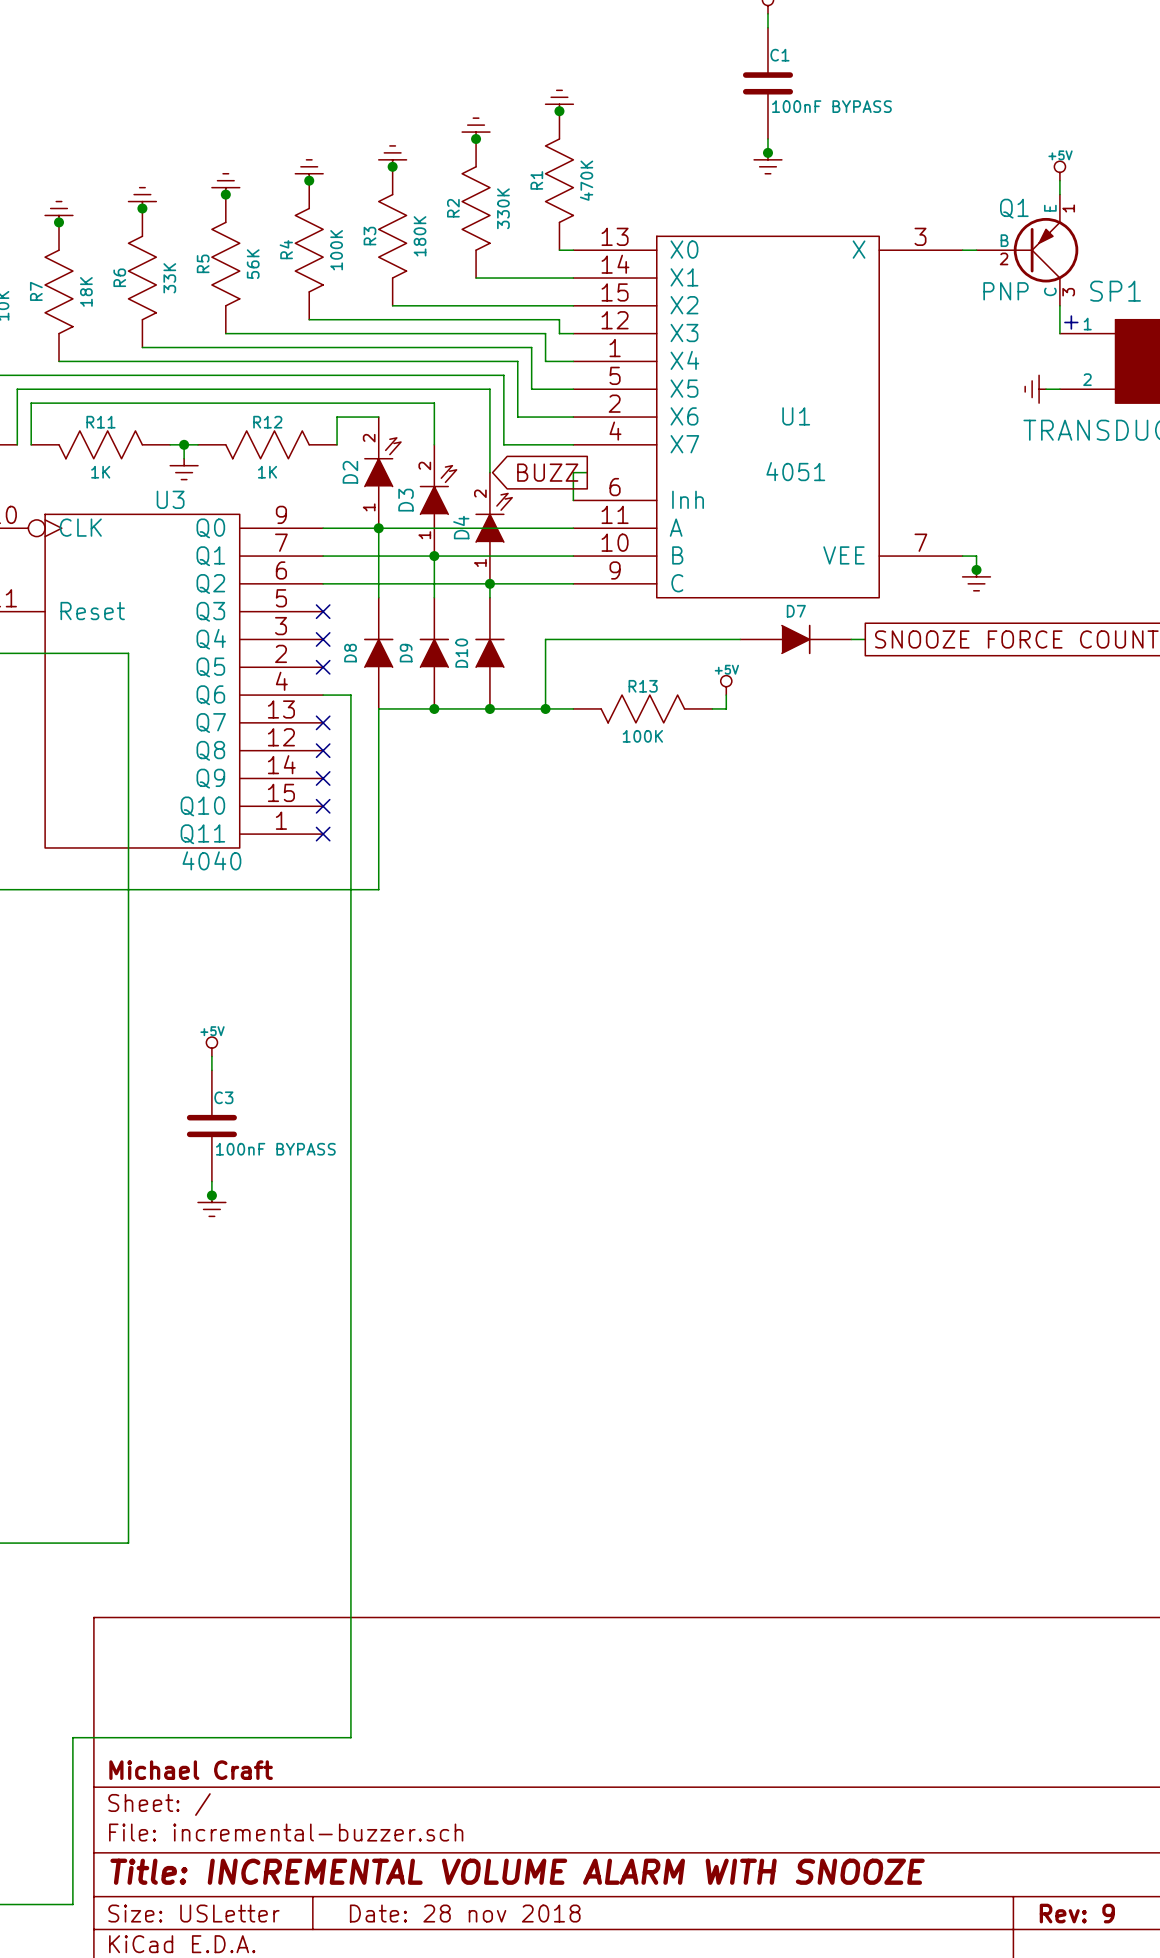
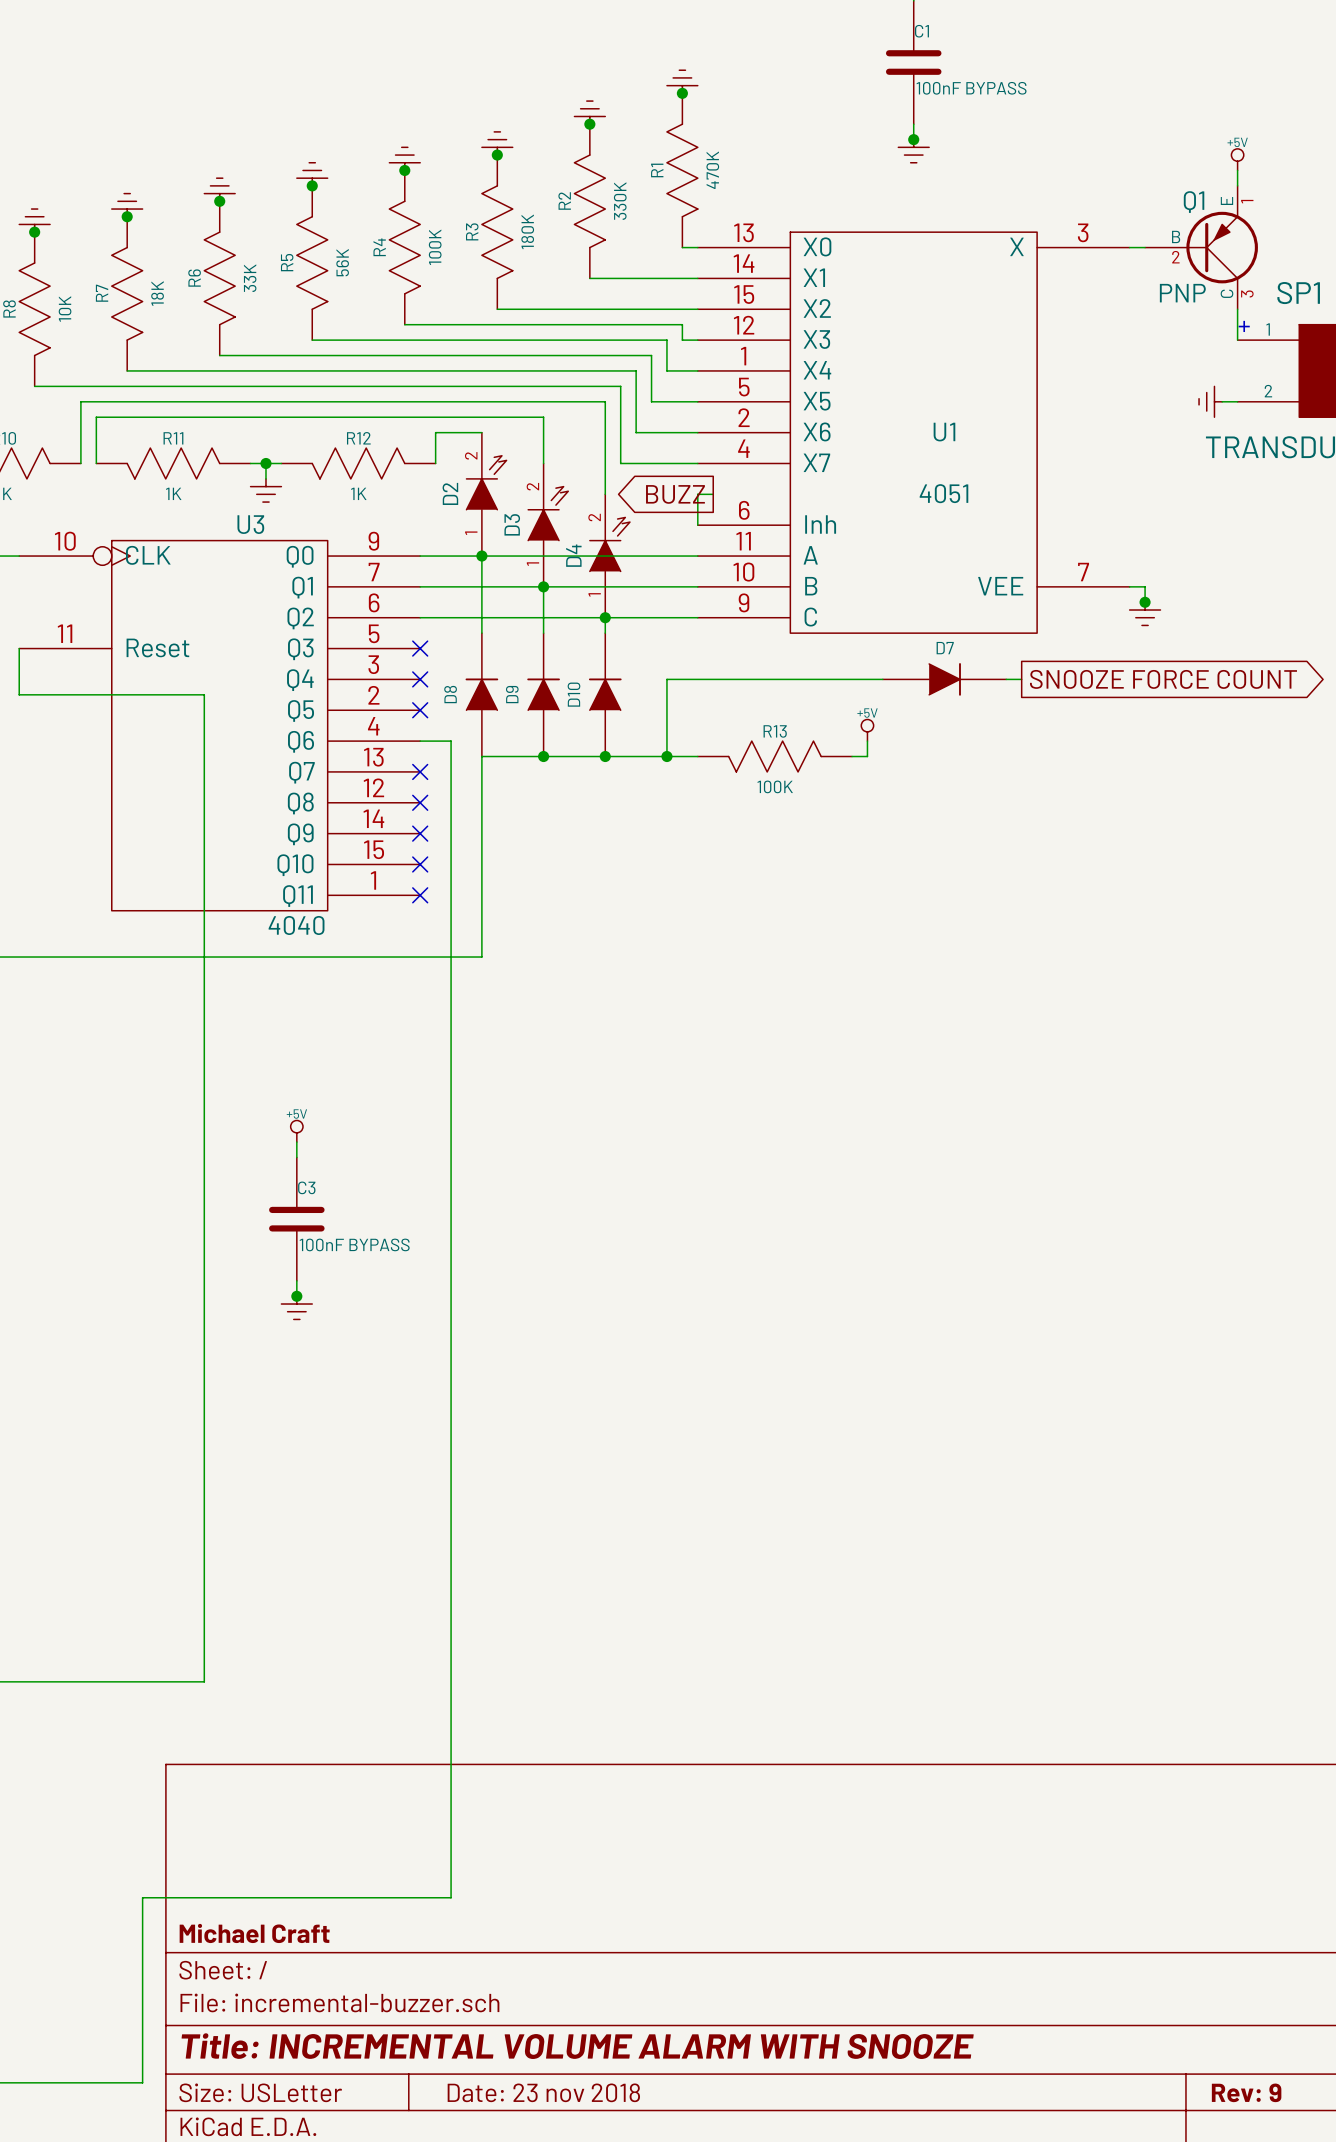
title block: Date: 28 nov 2018 (465, 1913) -> Date: 23 nov 2018 (543, 2092)

